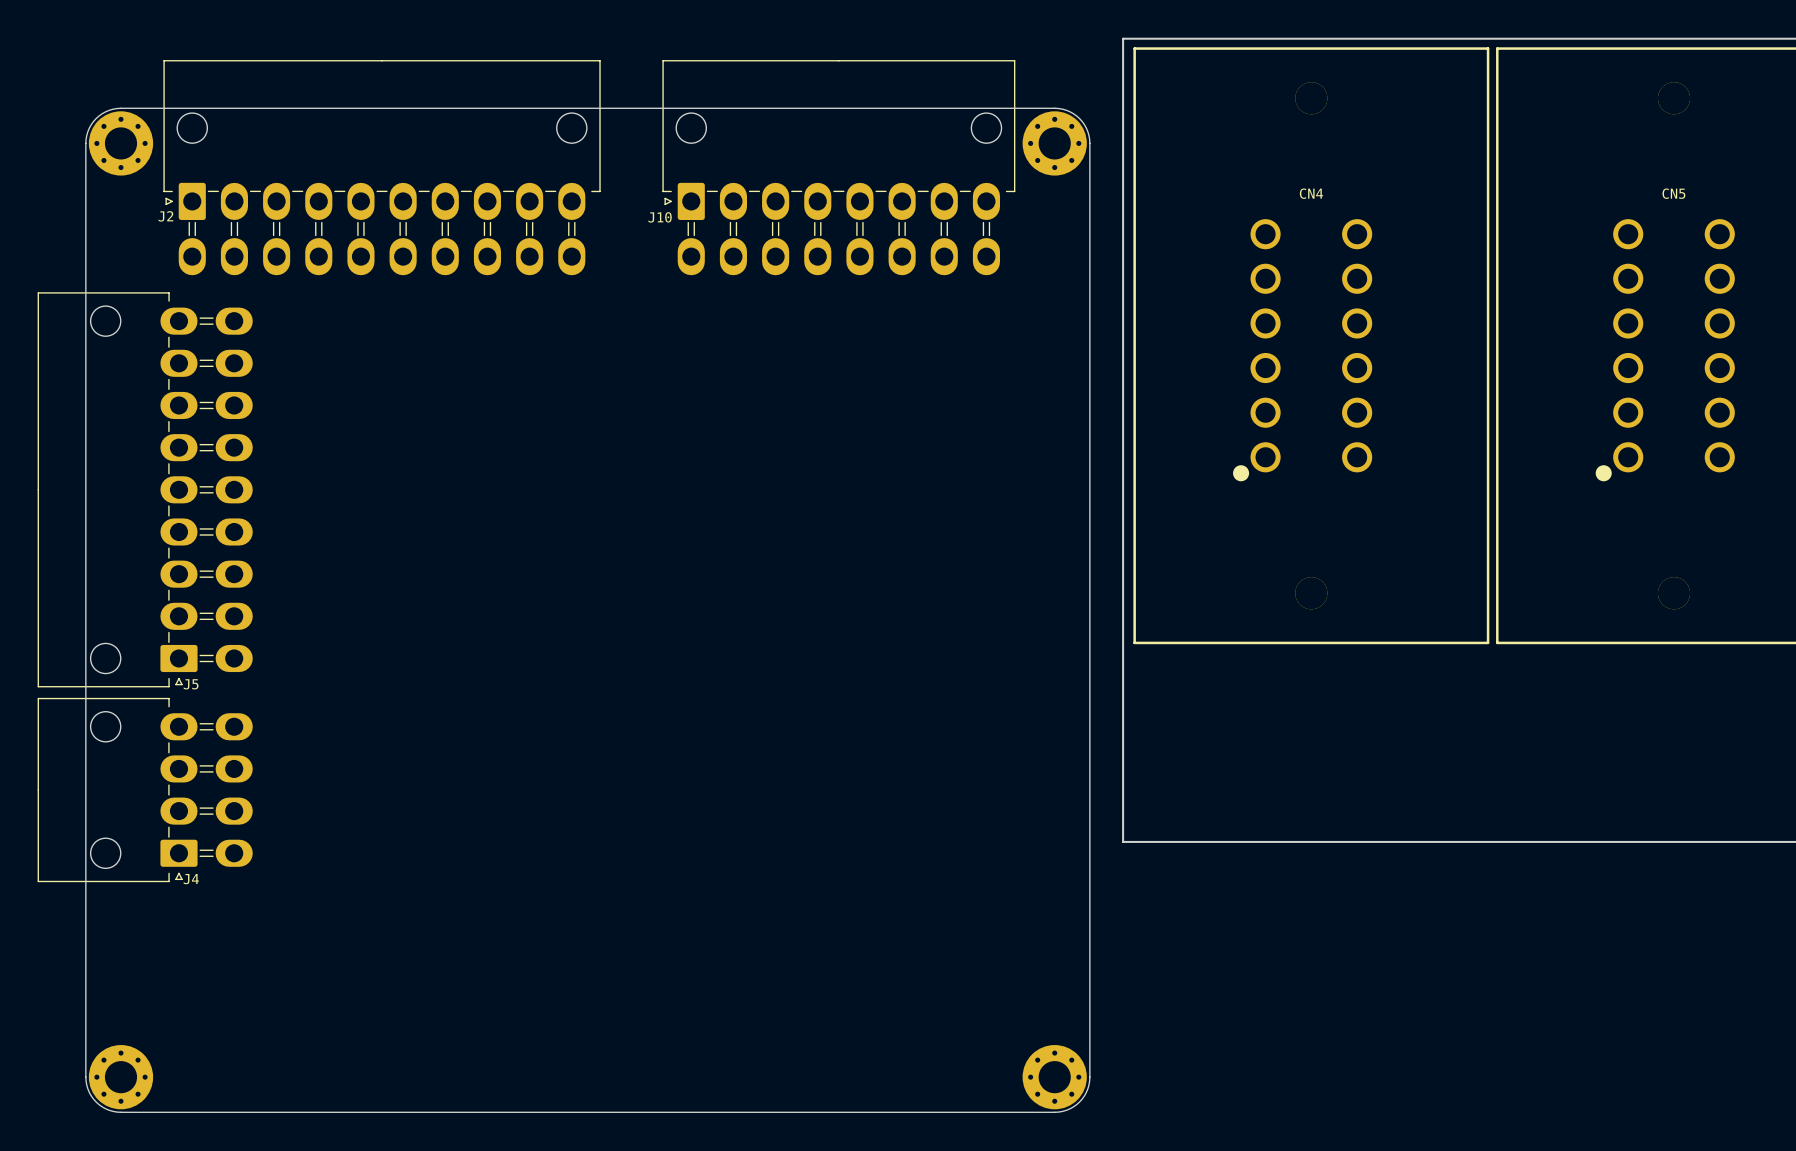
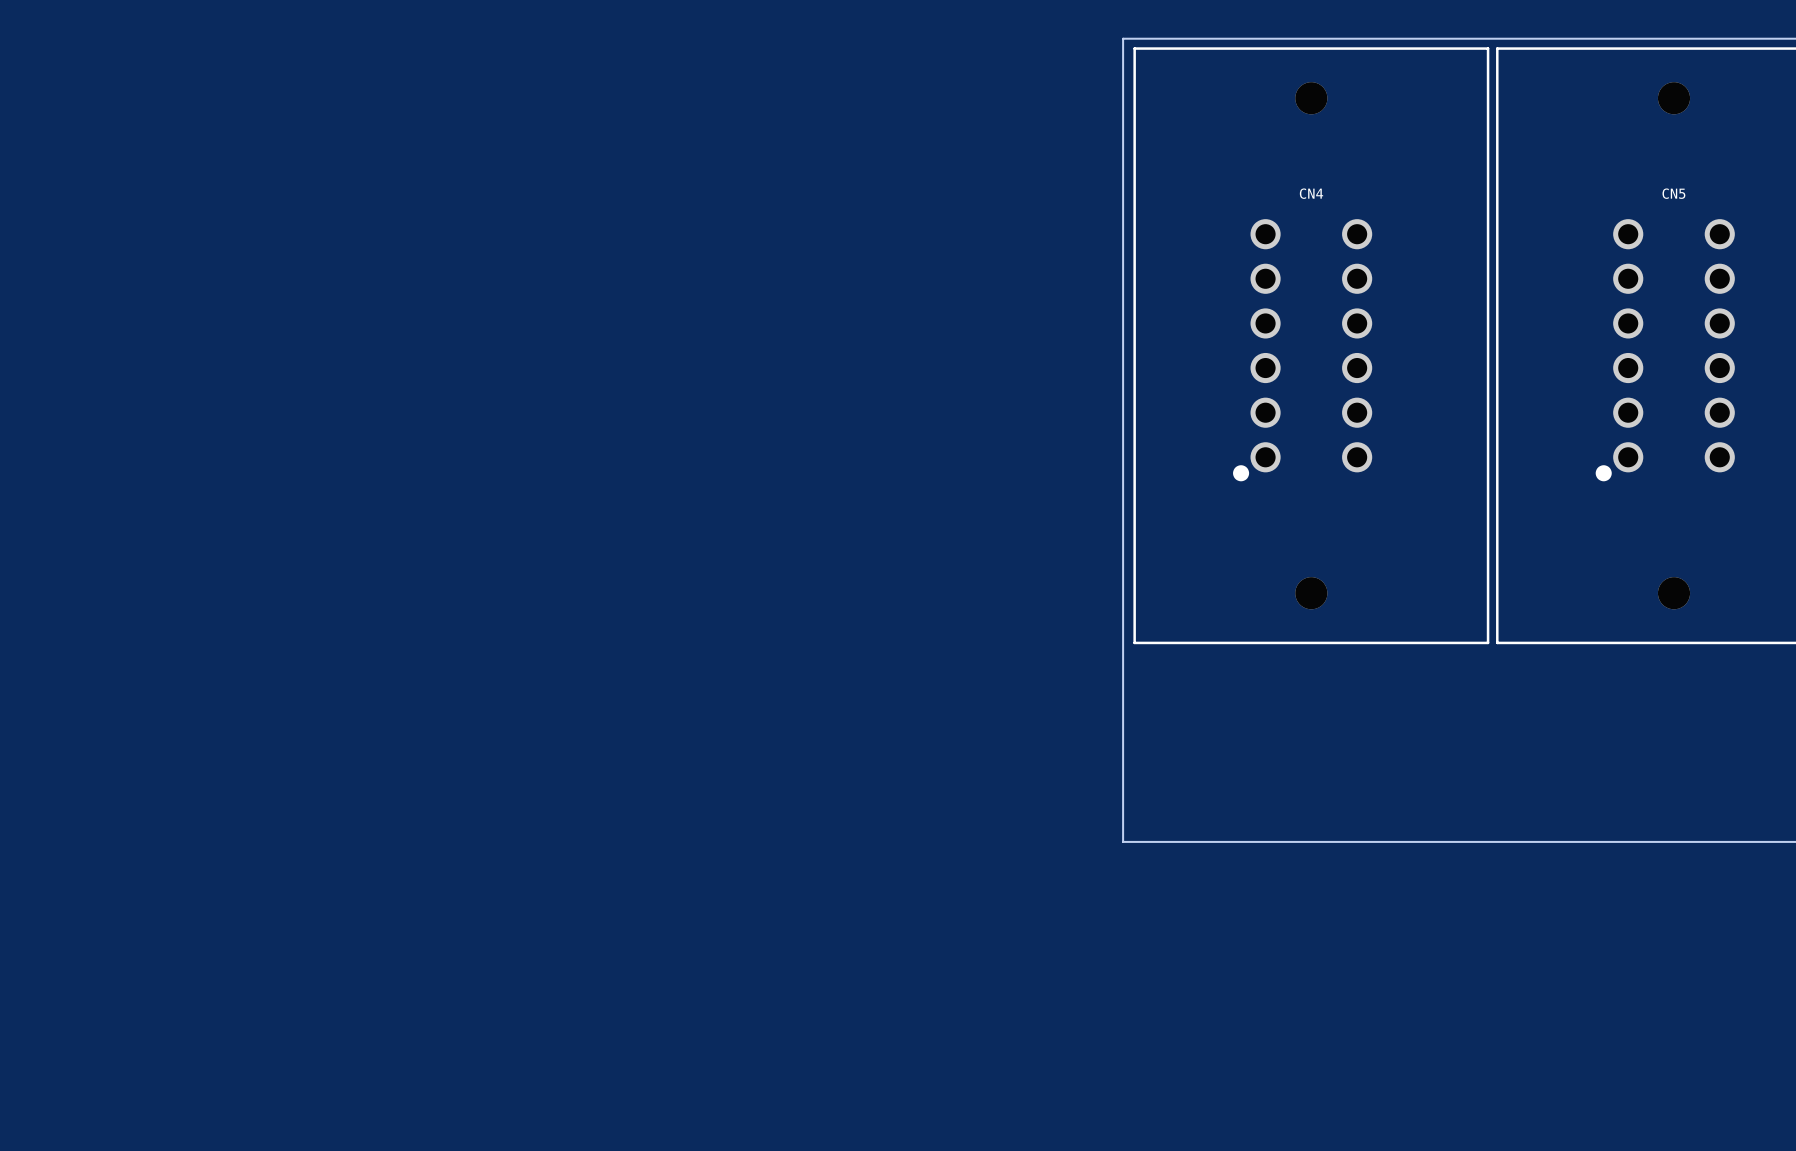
board edge: (120, 108) (1054, 108) (1066, 110) (1079, 118) (1087, 131) (1089, 143) (1089, 1077) (1087, 1088) (1079, 1102) (1066, 1110) (1054, 1112) (120, 1112) (109, 1110) (96, 1102) (87, 1088) (85, 1077) (85, 143) (87, 131) (96, 118) (109, 110) (120, 108) -> none
part: (120, 143) -> none
part: (1054, 143) -> none
J2: (382, 167) -> none
J10: (838, 167) -> none
J5: (145, 489) -> none
J4: (145, 790) -> none
part: (120, 1077) -> none
part: (1054, 1077) -> none

